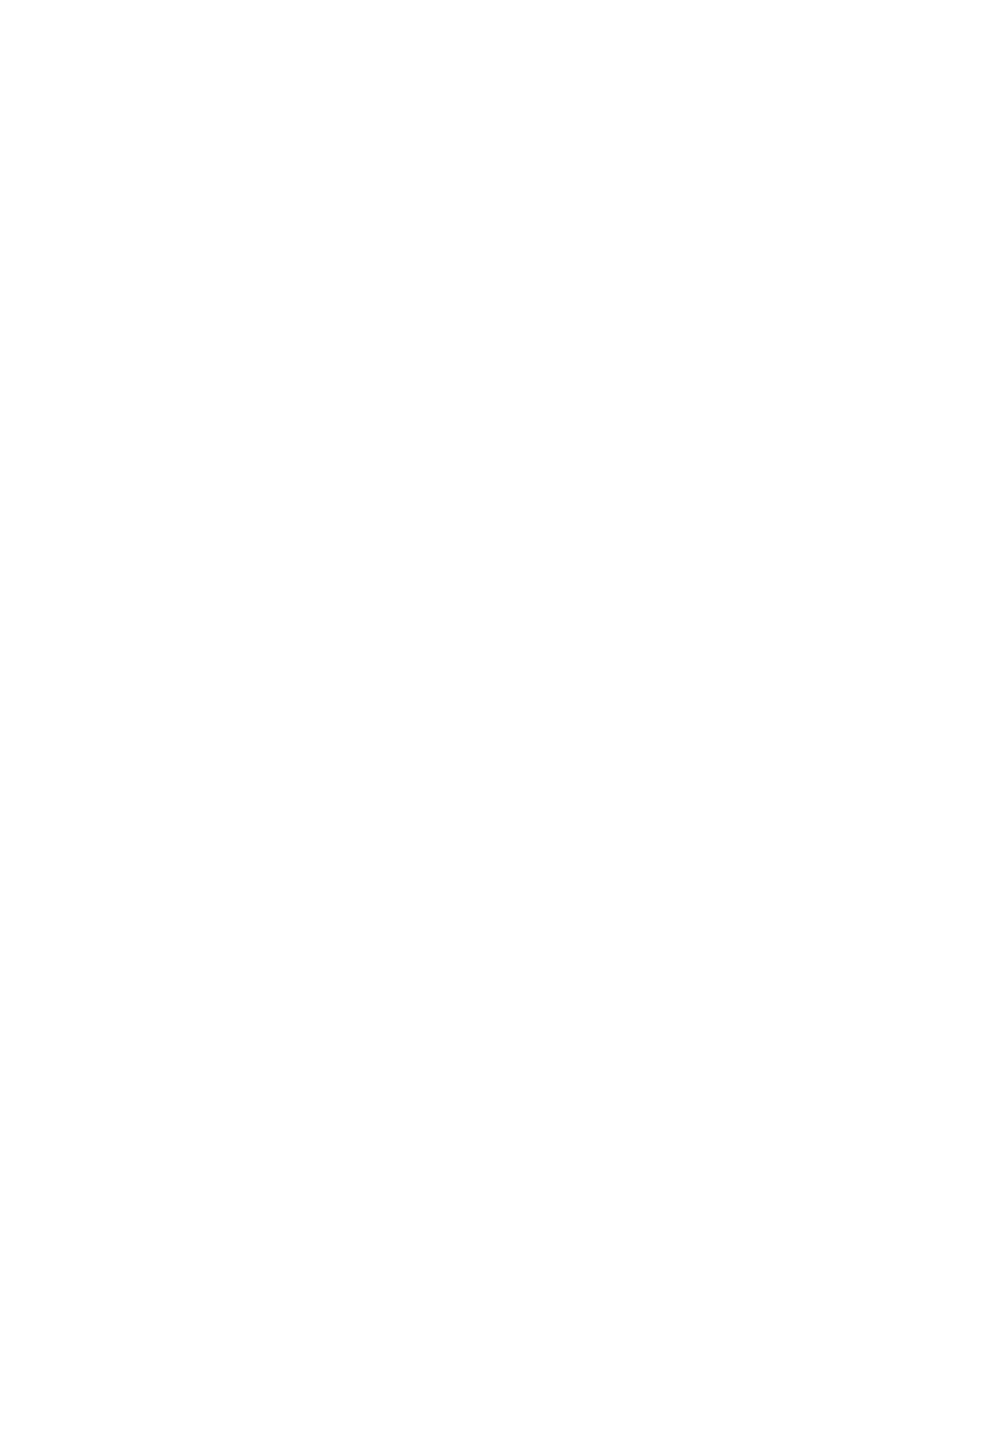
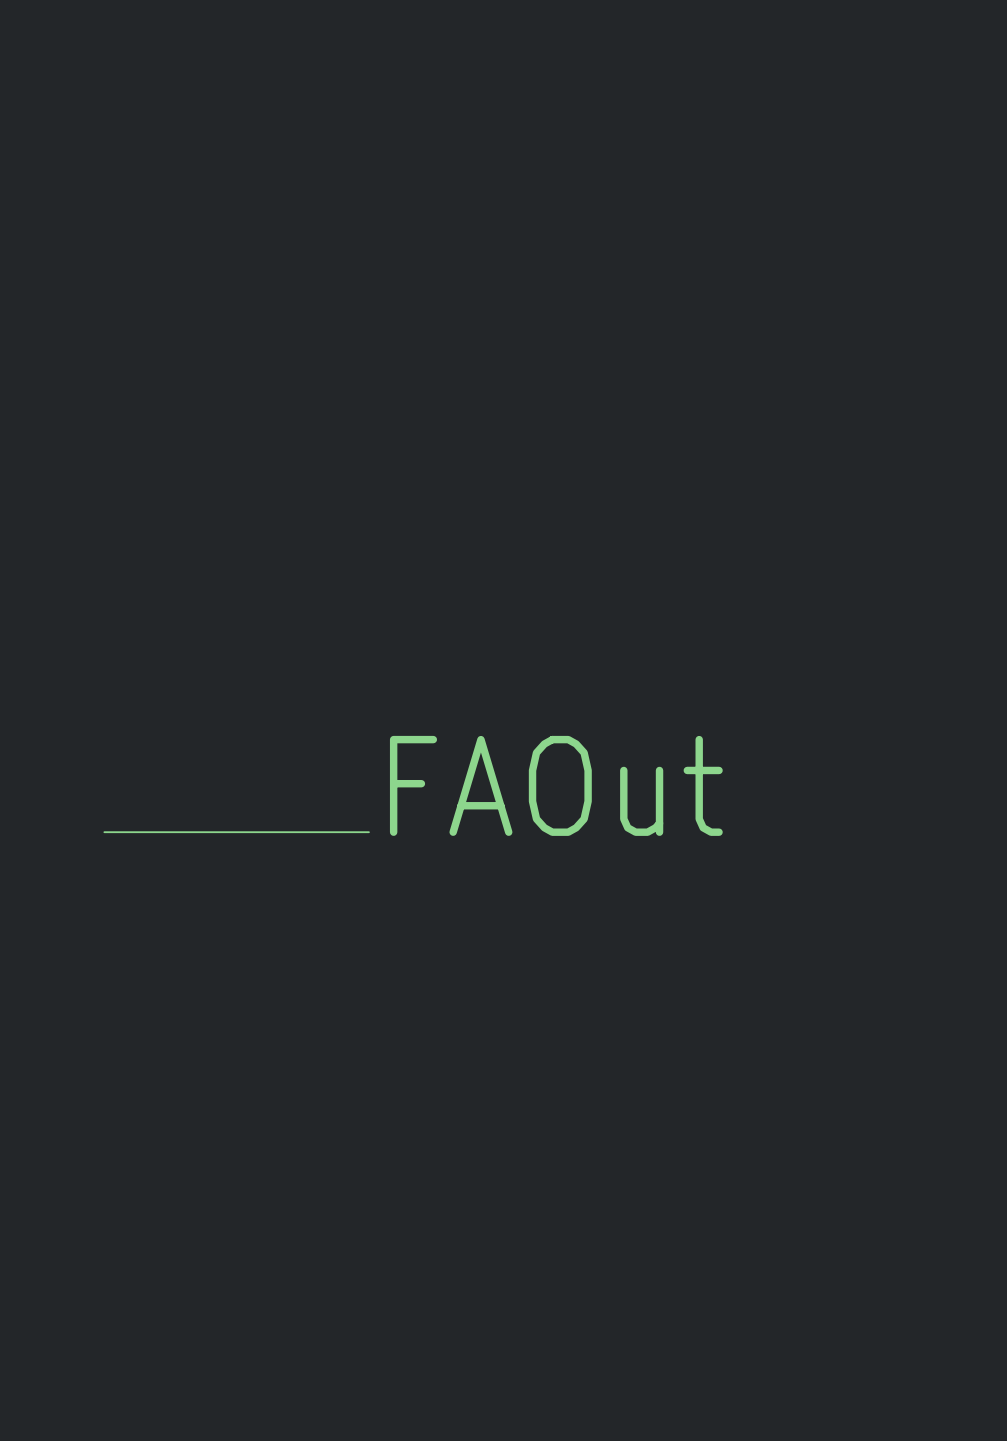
text: none -> FAOut (556, 785)
wire: none -> (104, 832) (368, 832)

